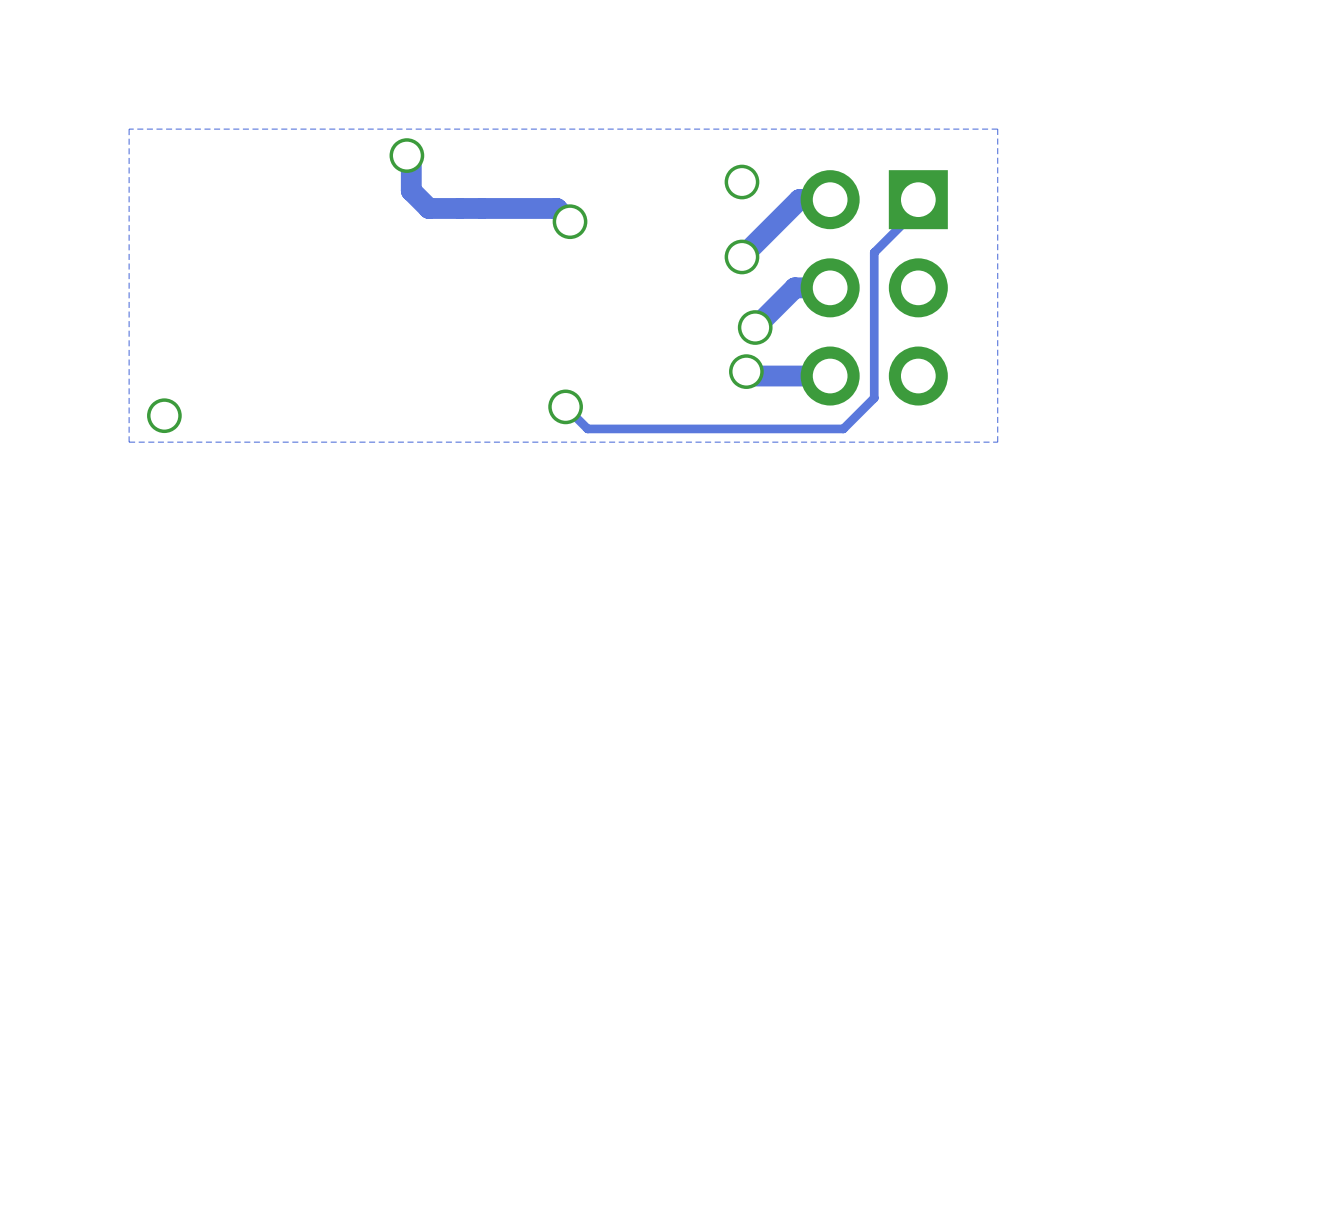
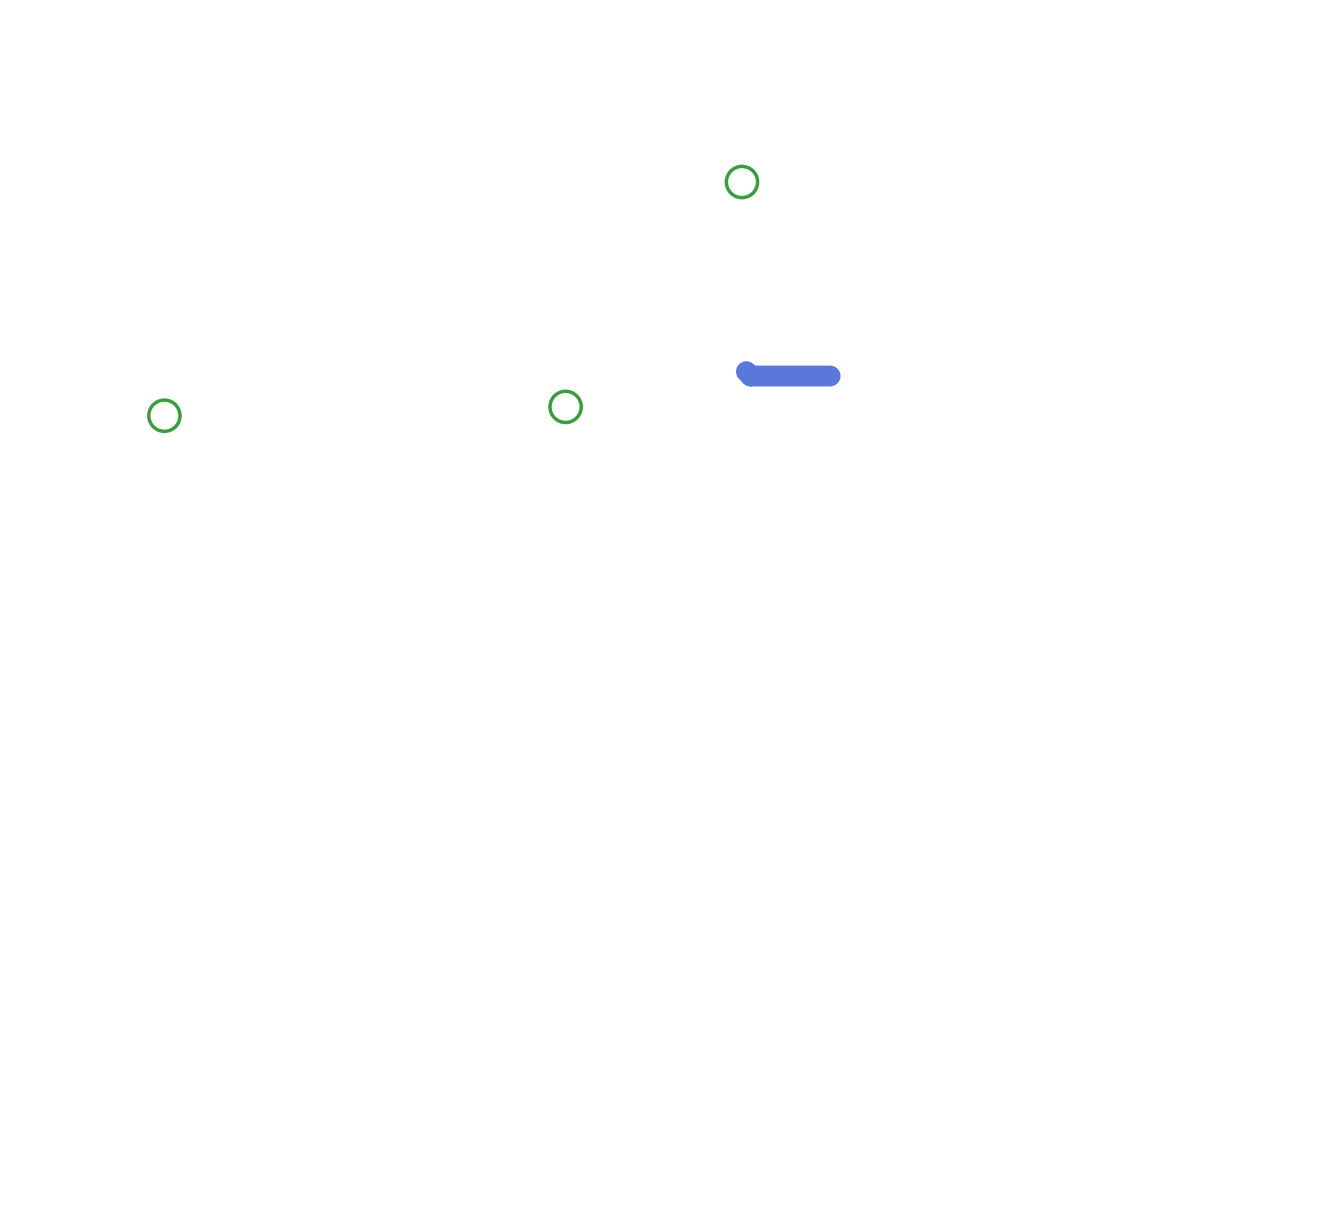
zone outline: (997, 129) (997, 442) (129, 442) (129, 129) (997, 129) -> none
track: (406, 155) (411, 159) (411, 190) (428, 208) (556, 208) (570, 221) -> none
via: (406, 155) -> none
track: (830, 199) (799, 199) (741, 256) -> none
track: (918, 199) (918, 208) (874, 252) (874, 398) (843, 428) (587, 428) (565, 406) -> none
via: (570, 221) -> none
via: (741, 256) -> none
track: (830, 287) (794, 287) (755, 327) -> none
part: (874, 287) -> none
via: (755, 327) -> none
via: (746, 371) -> none

